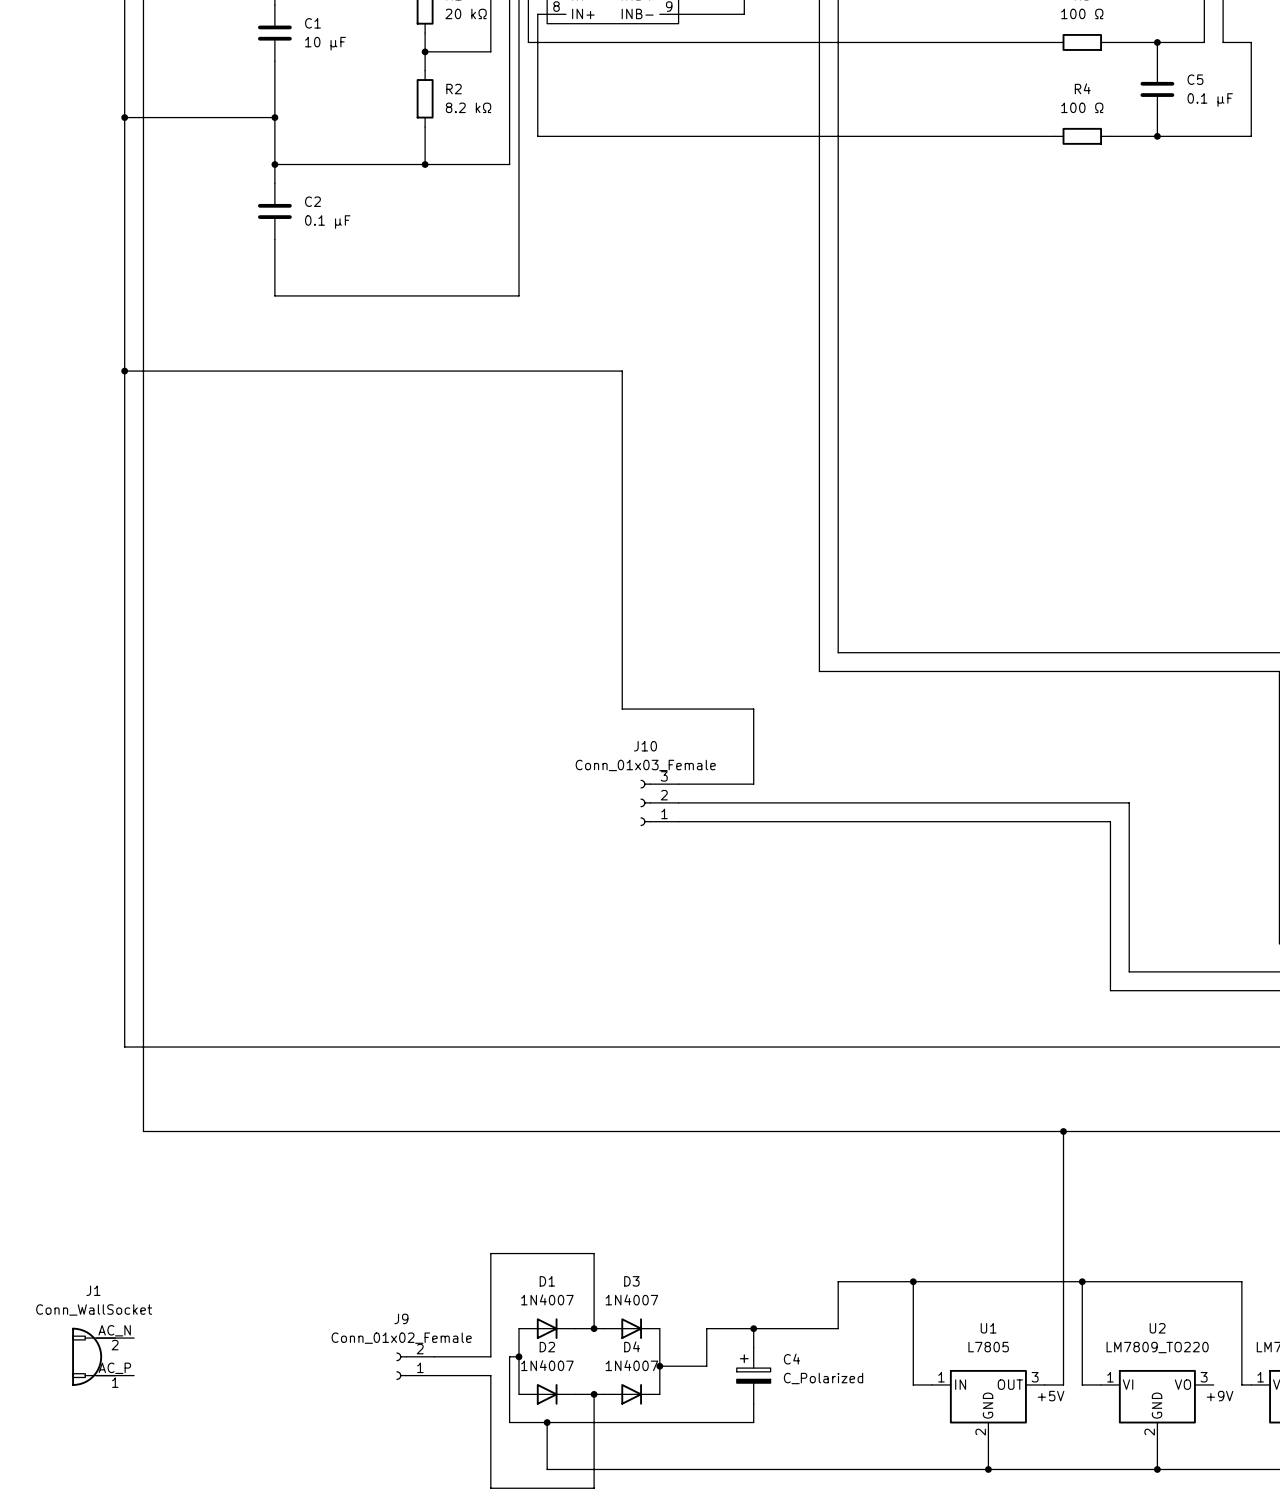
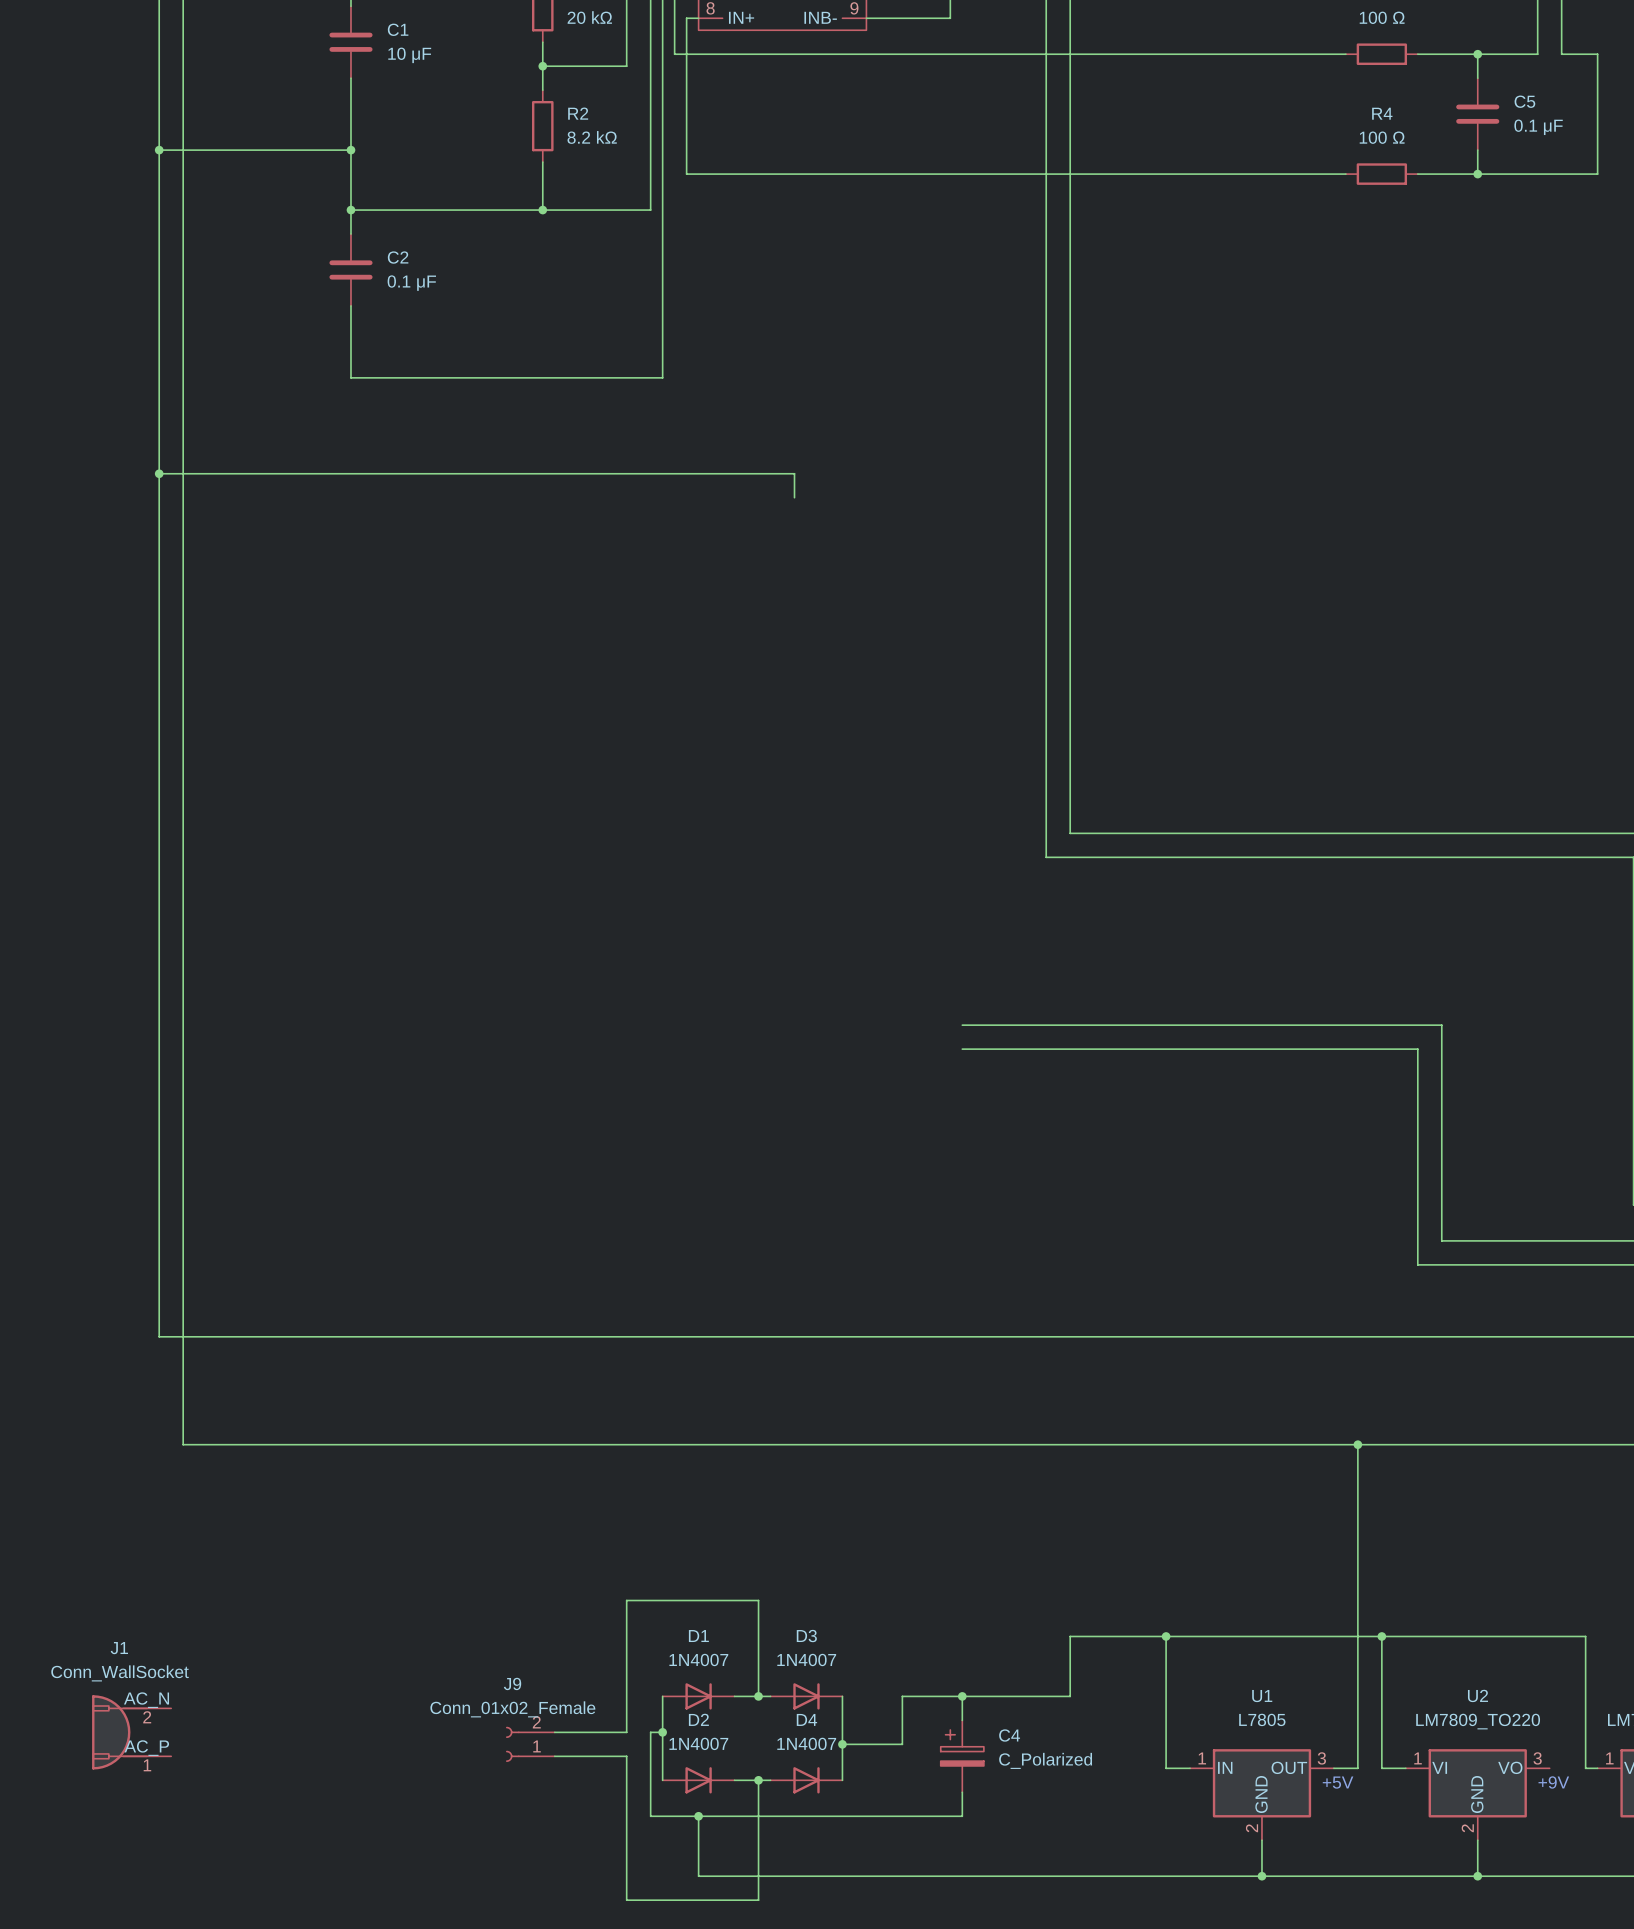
wire: (622, 389) (622, 709) (753, 709) (753, 784) (678, 784) -> none
J10: Conn_01x03_Female (659, 802) -> none
wire: (678, 802) (753, 802) -> none
wire: (678, 821) (753, 821) -> none

